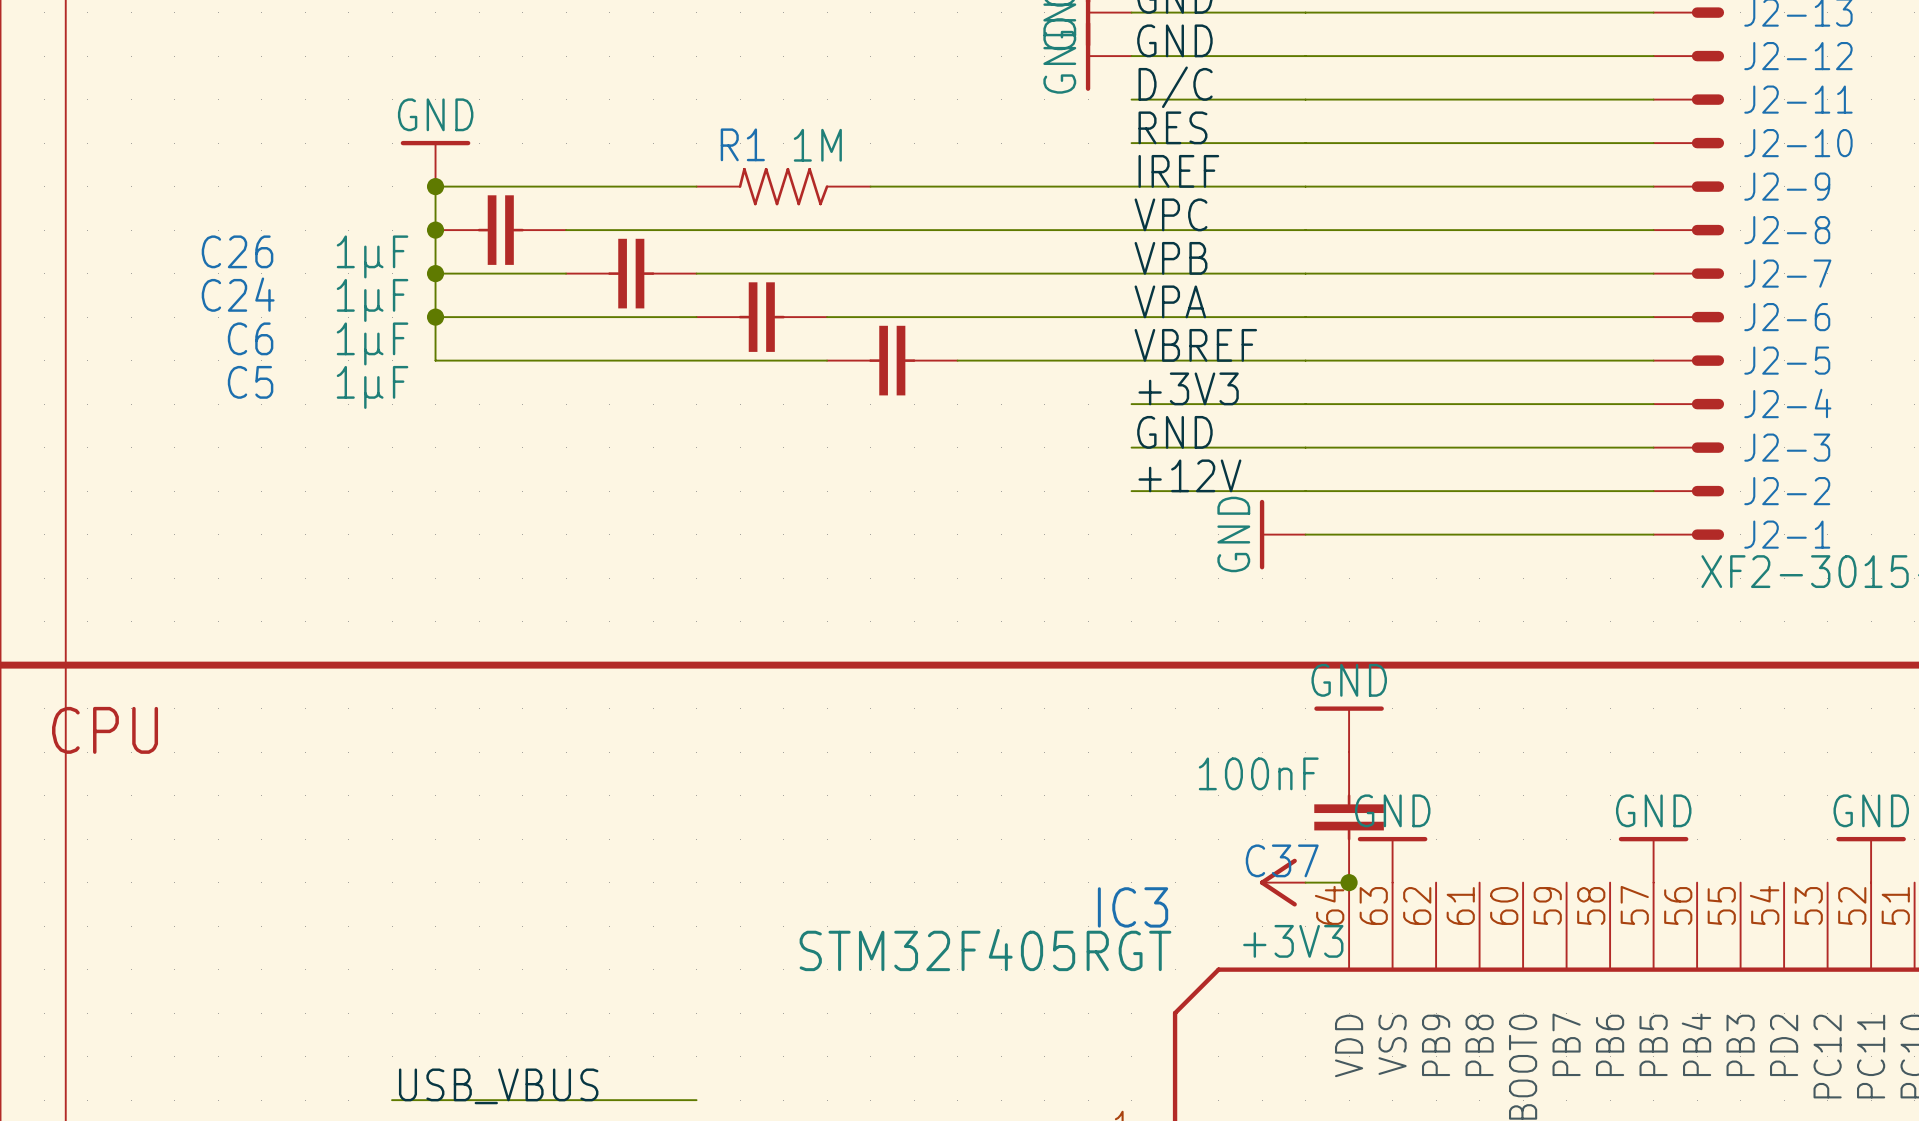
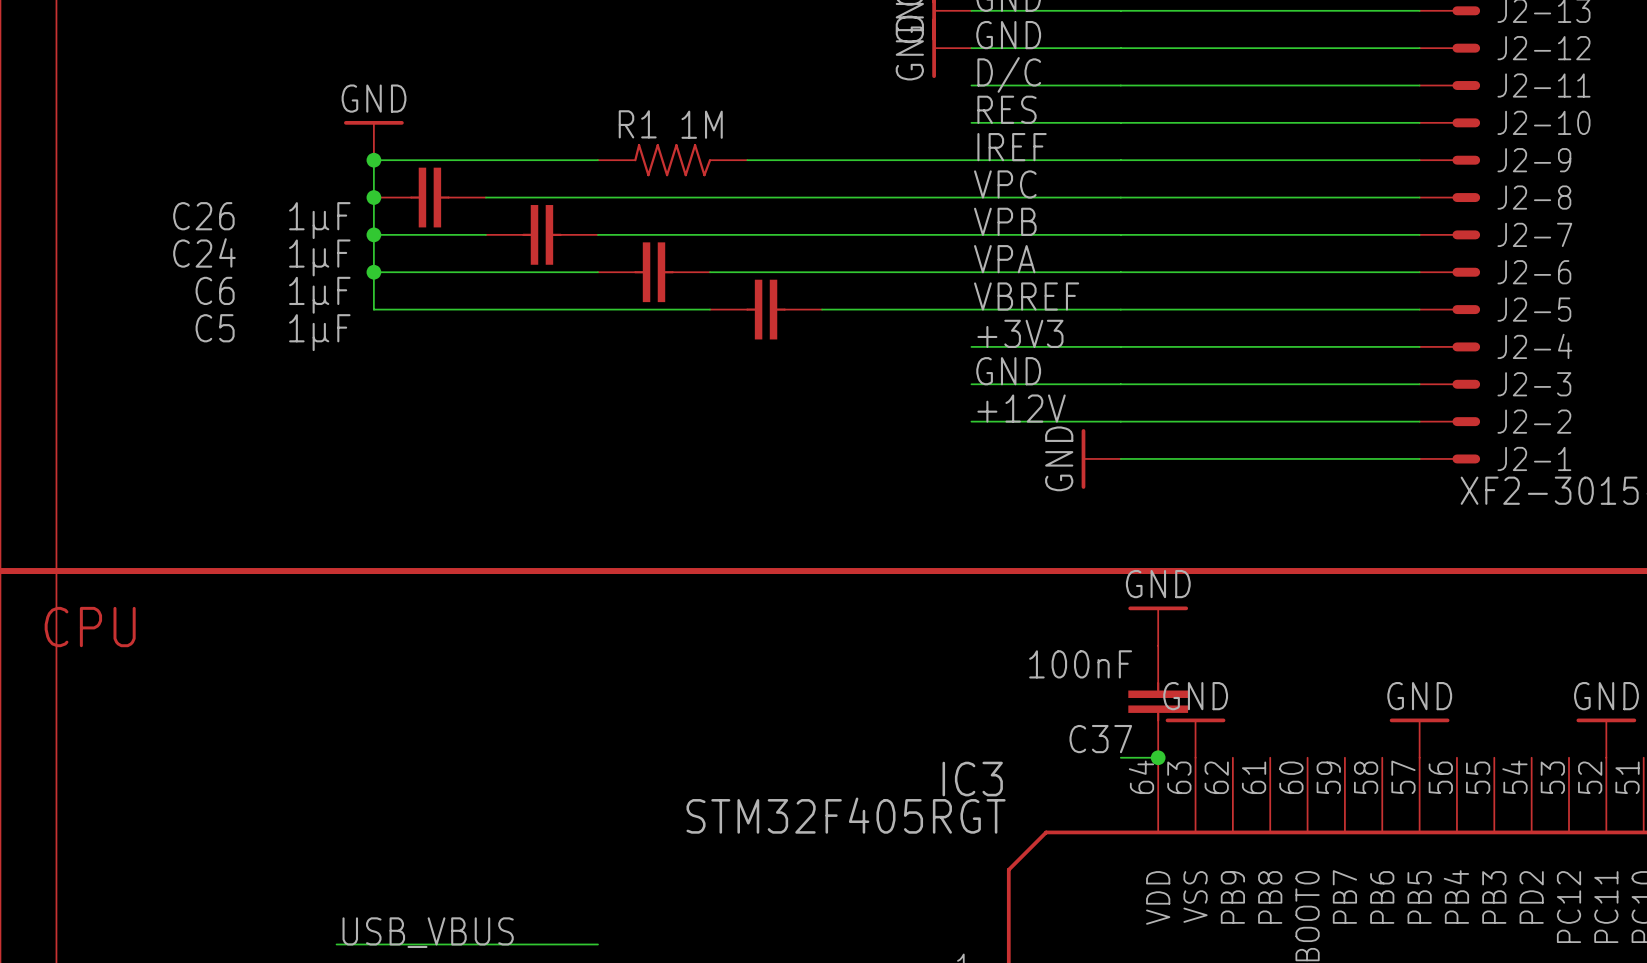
power symbol: +3V3 (1282, 882) -> none

